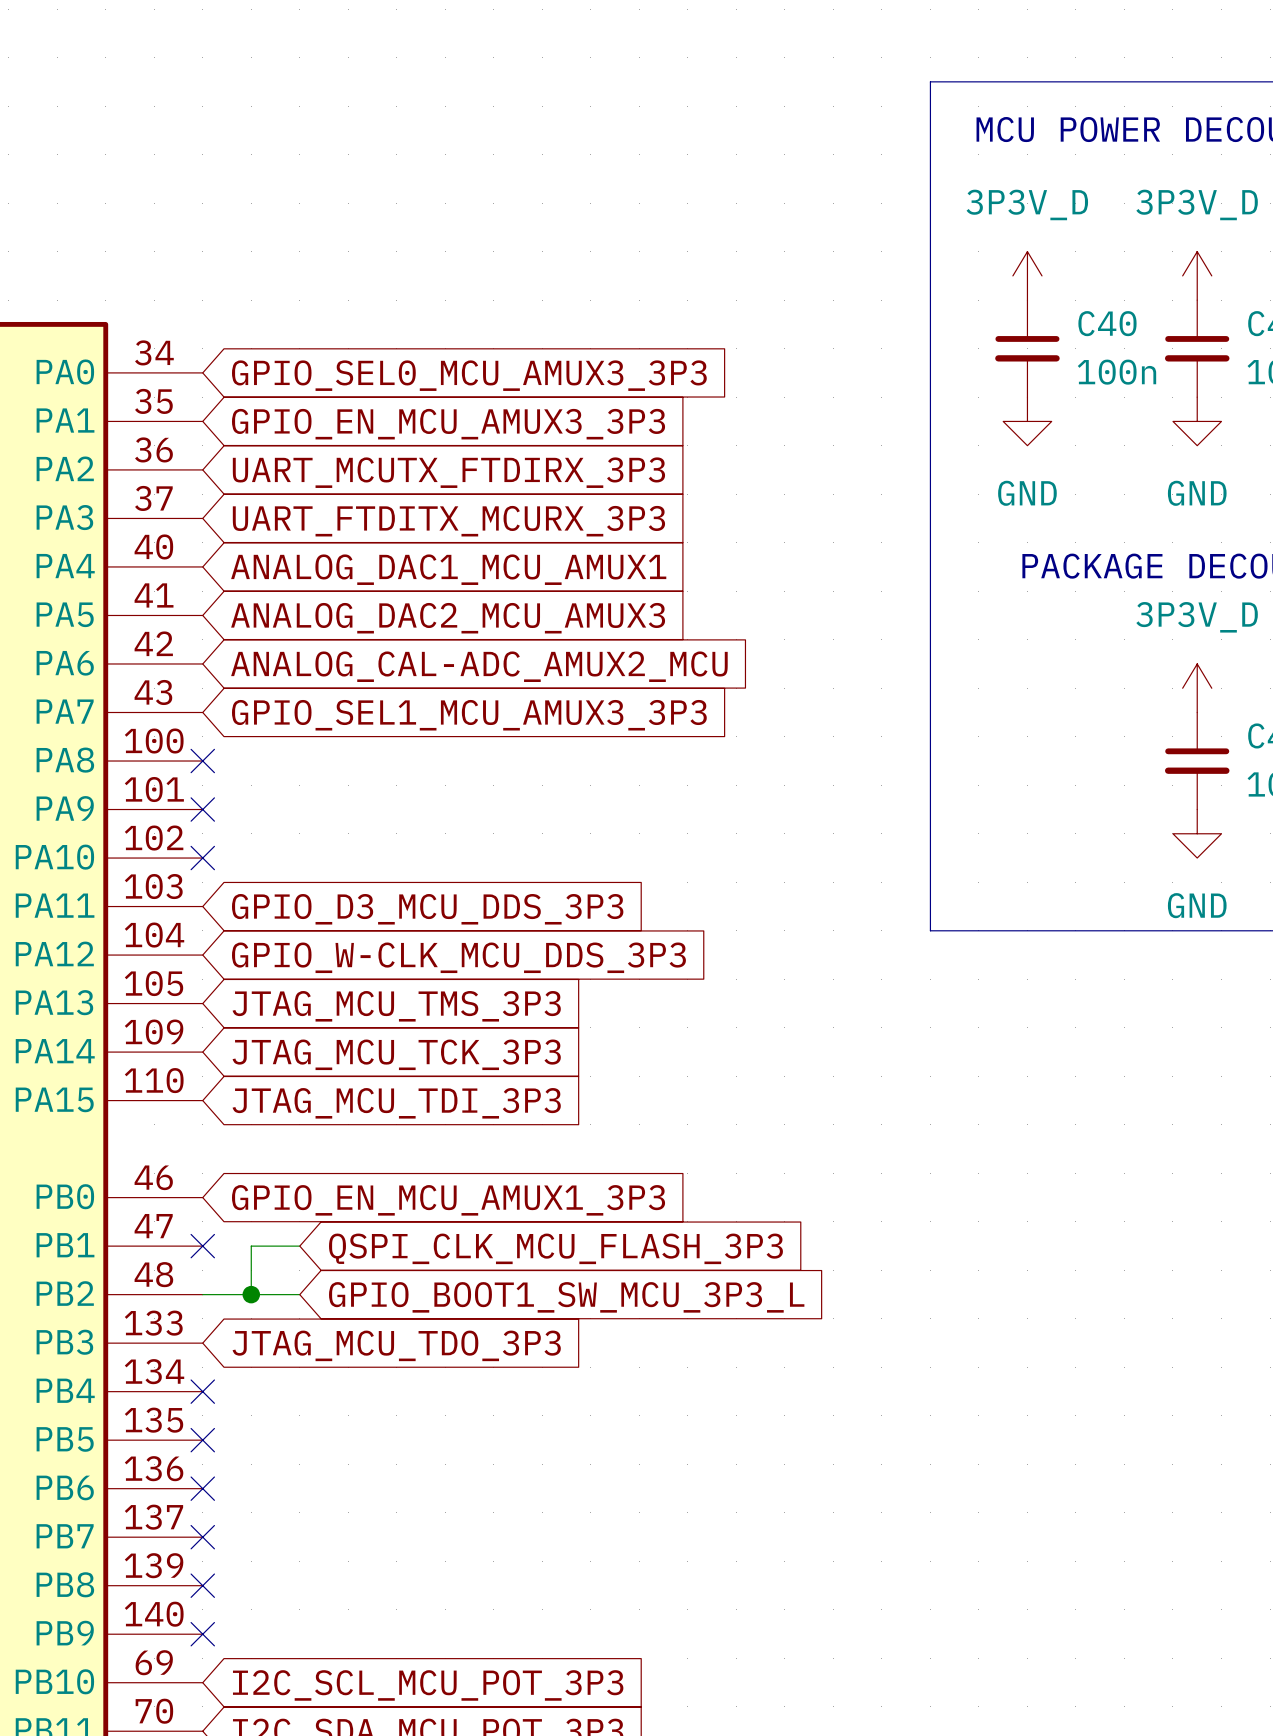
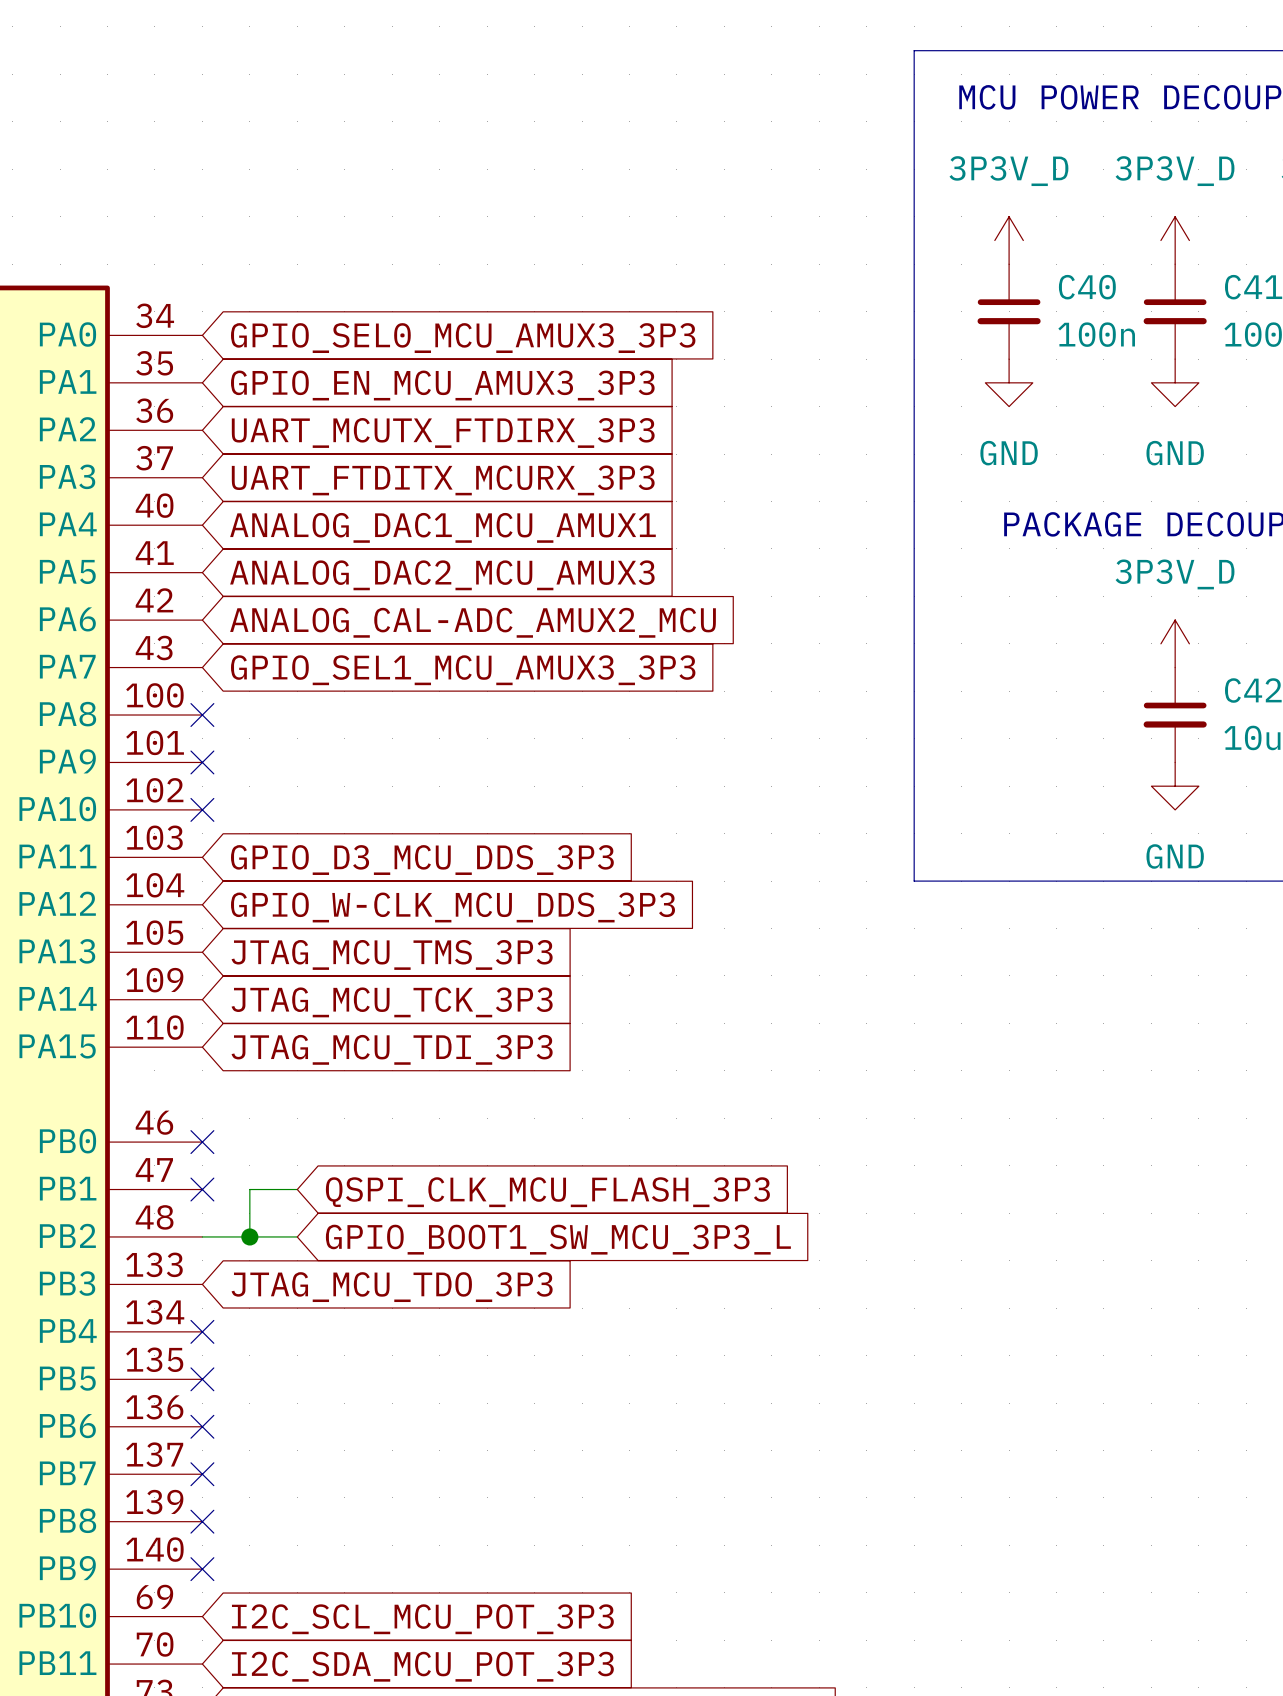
no-connect mark: none -> (202, 1142)
global label: GPIO_EN_MCU_AMUX1_3P3 (448, 1200) -> none

